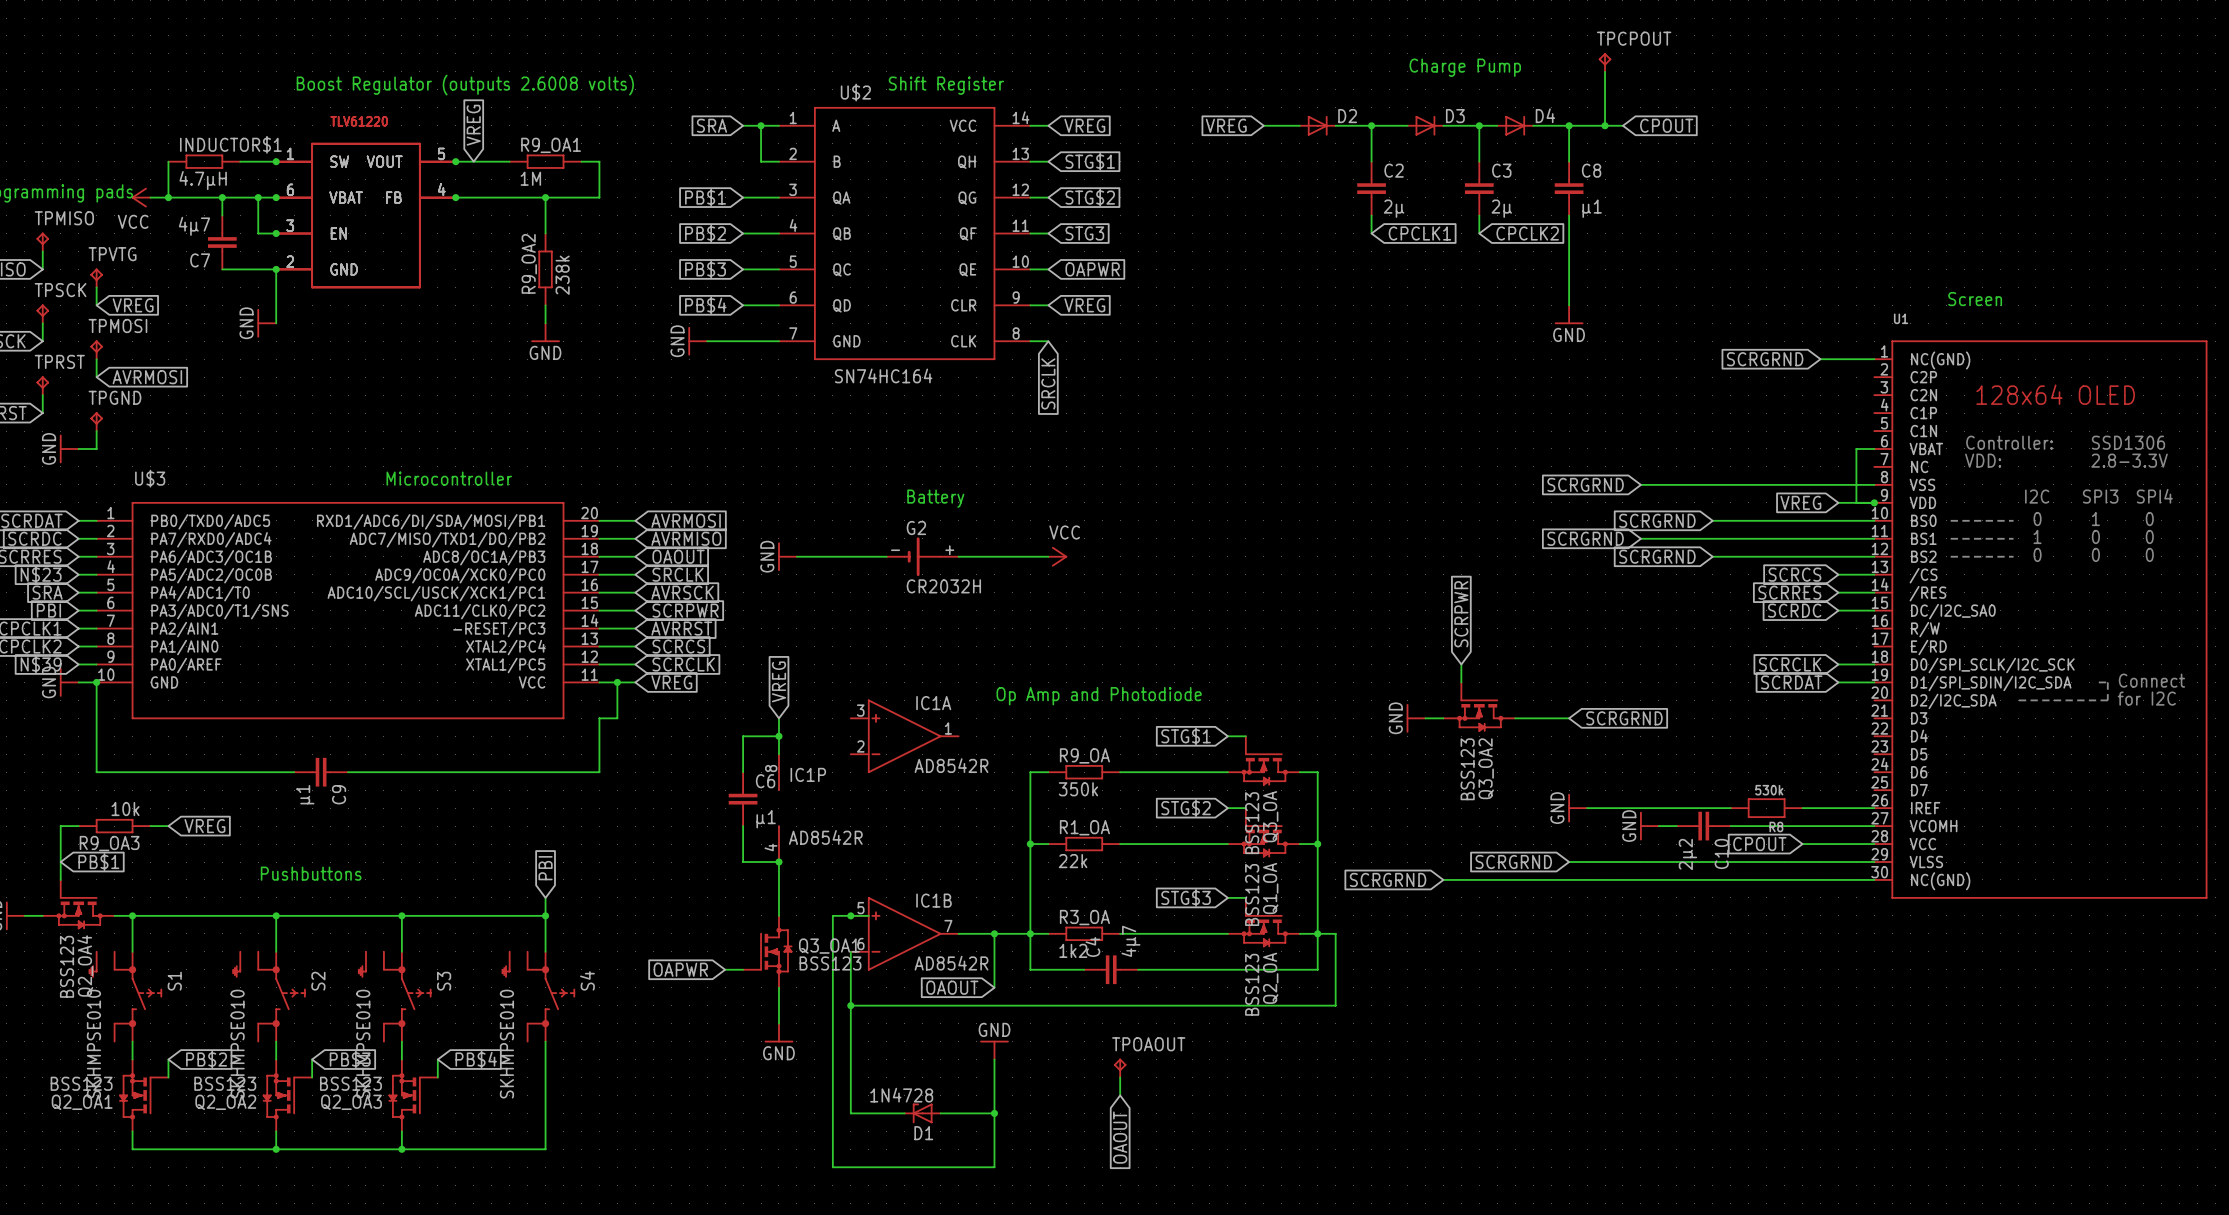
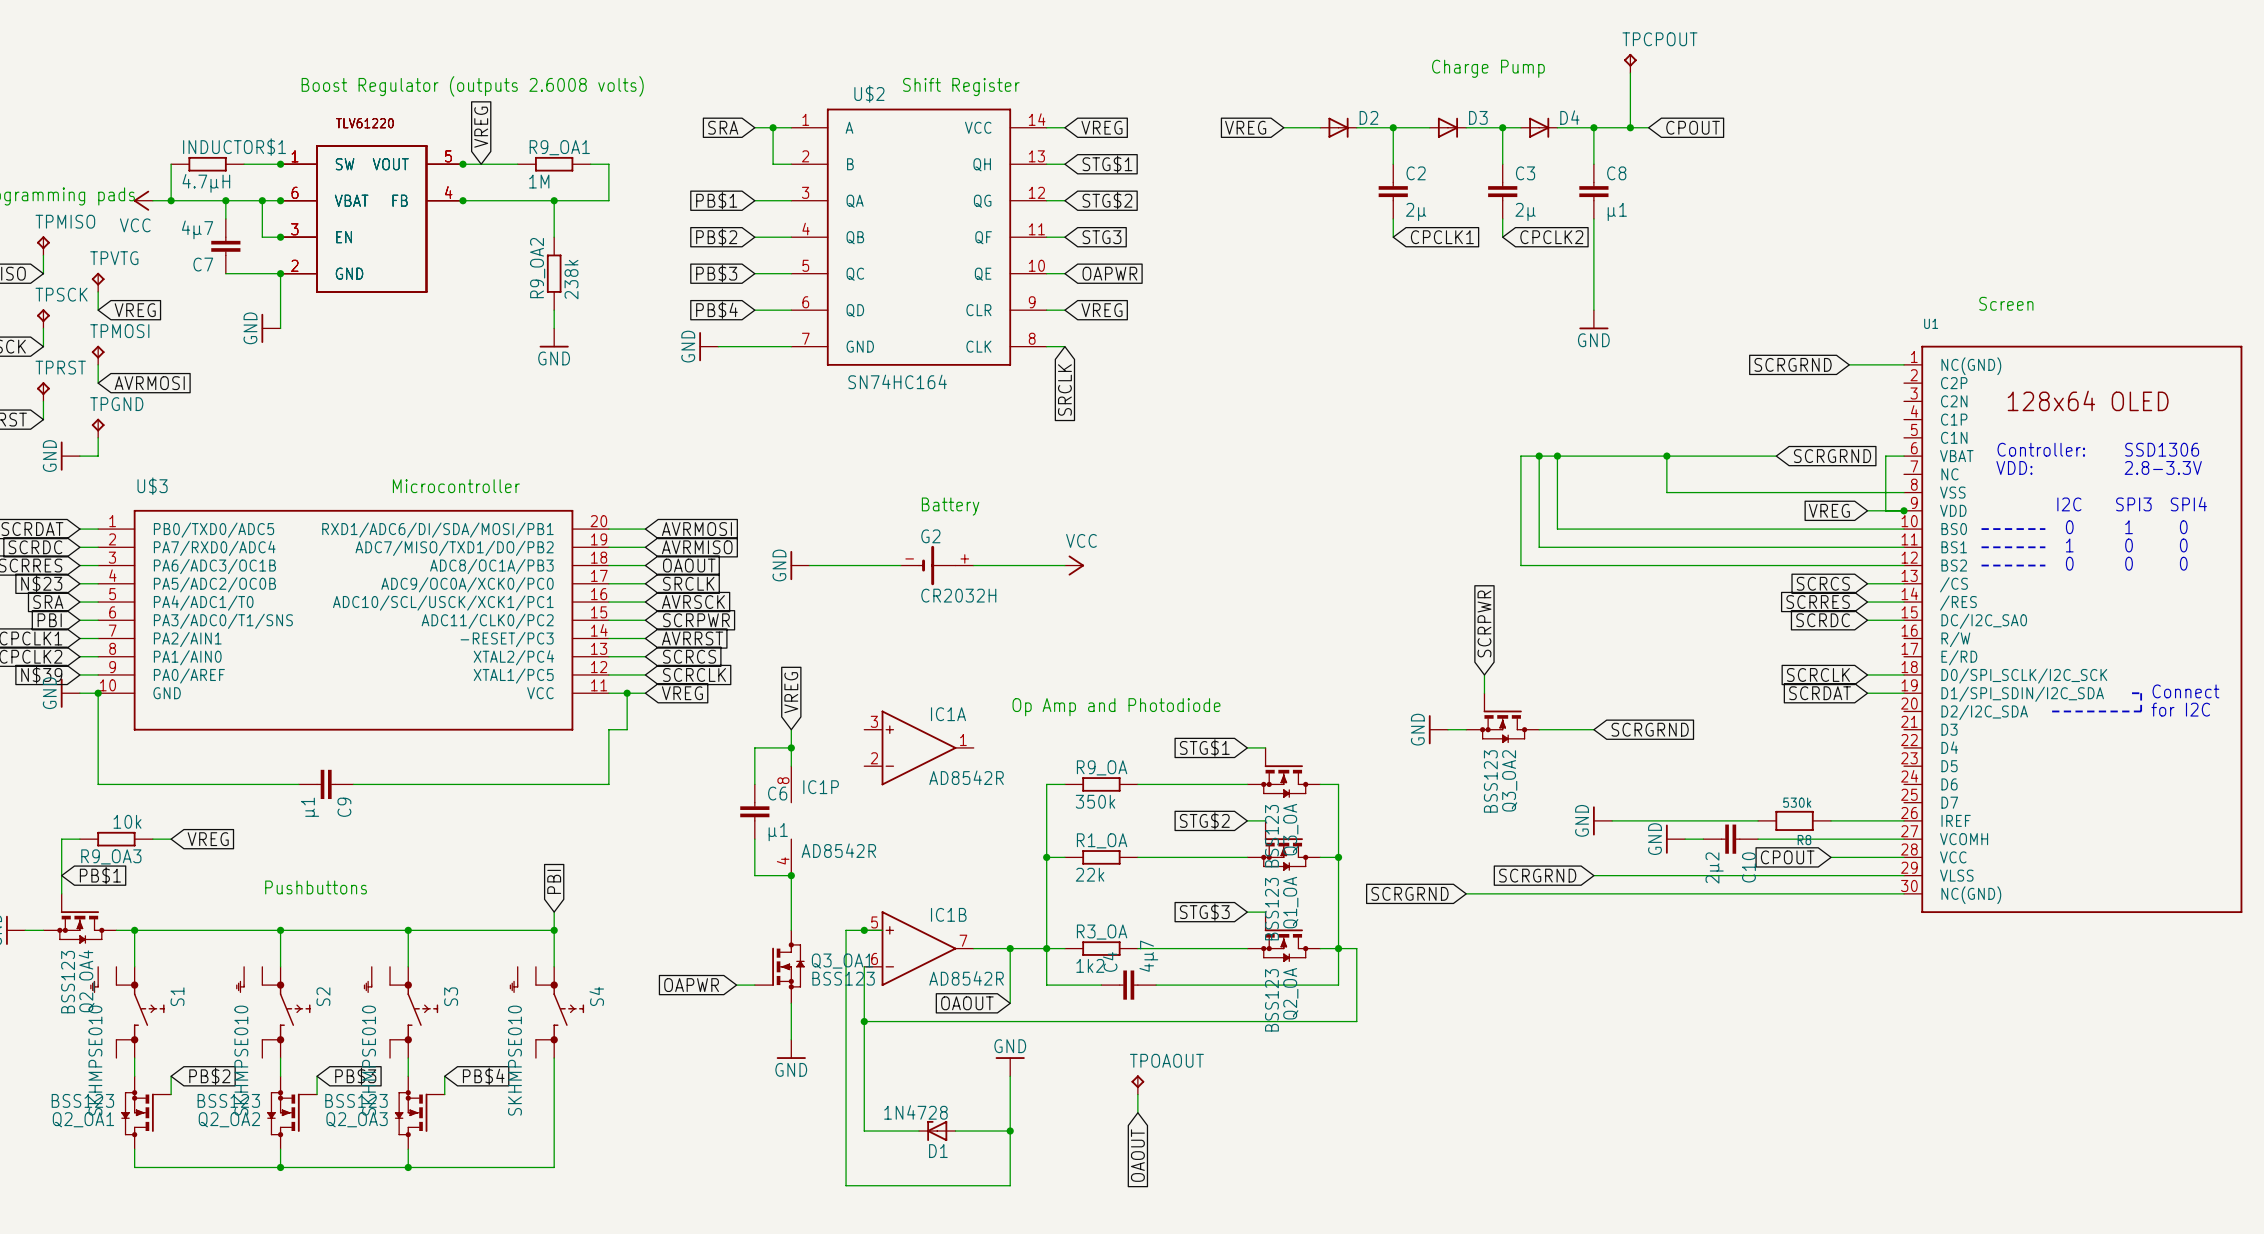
wire: none -> (1539, 456) (1539, 547) (1666, 547)
junction: none -> (1539, 456)
wire: none -> (1557, 456) (1557, 529) (1739, 529)
junction: none -> (1557, 456)
wire: none -> (1666, 456) (1666, 492)
junction: none -> (1666, 456)
wire: none -> (1776, 456) (1520, 456) (1520, 565) (1739, 565)
global label: none -> SCRGRND (1832, 456)
global label: SCRGRND (1585, 484) -> none
global label: SCRGRND (1657, 520) -> none
global label: SCRGRND (1585, 538) -> none
global label: SCRGRND (1657, 556) -> none

